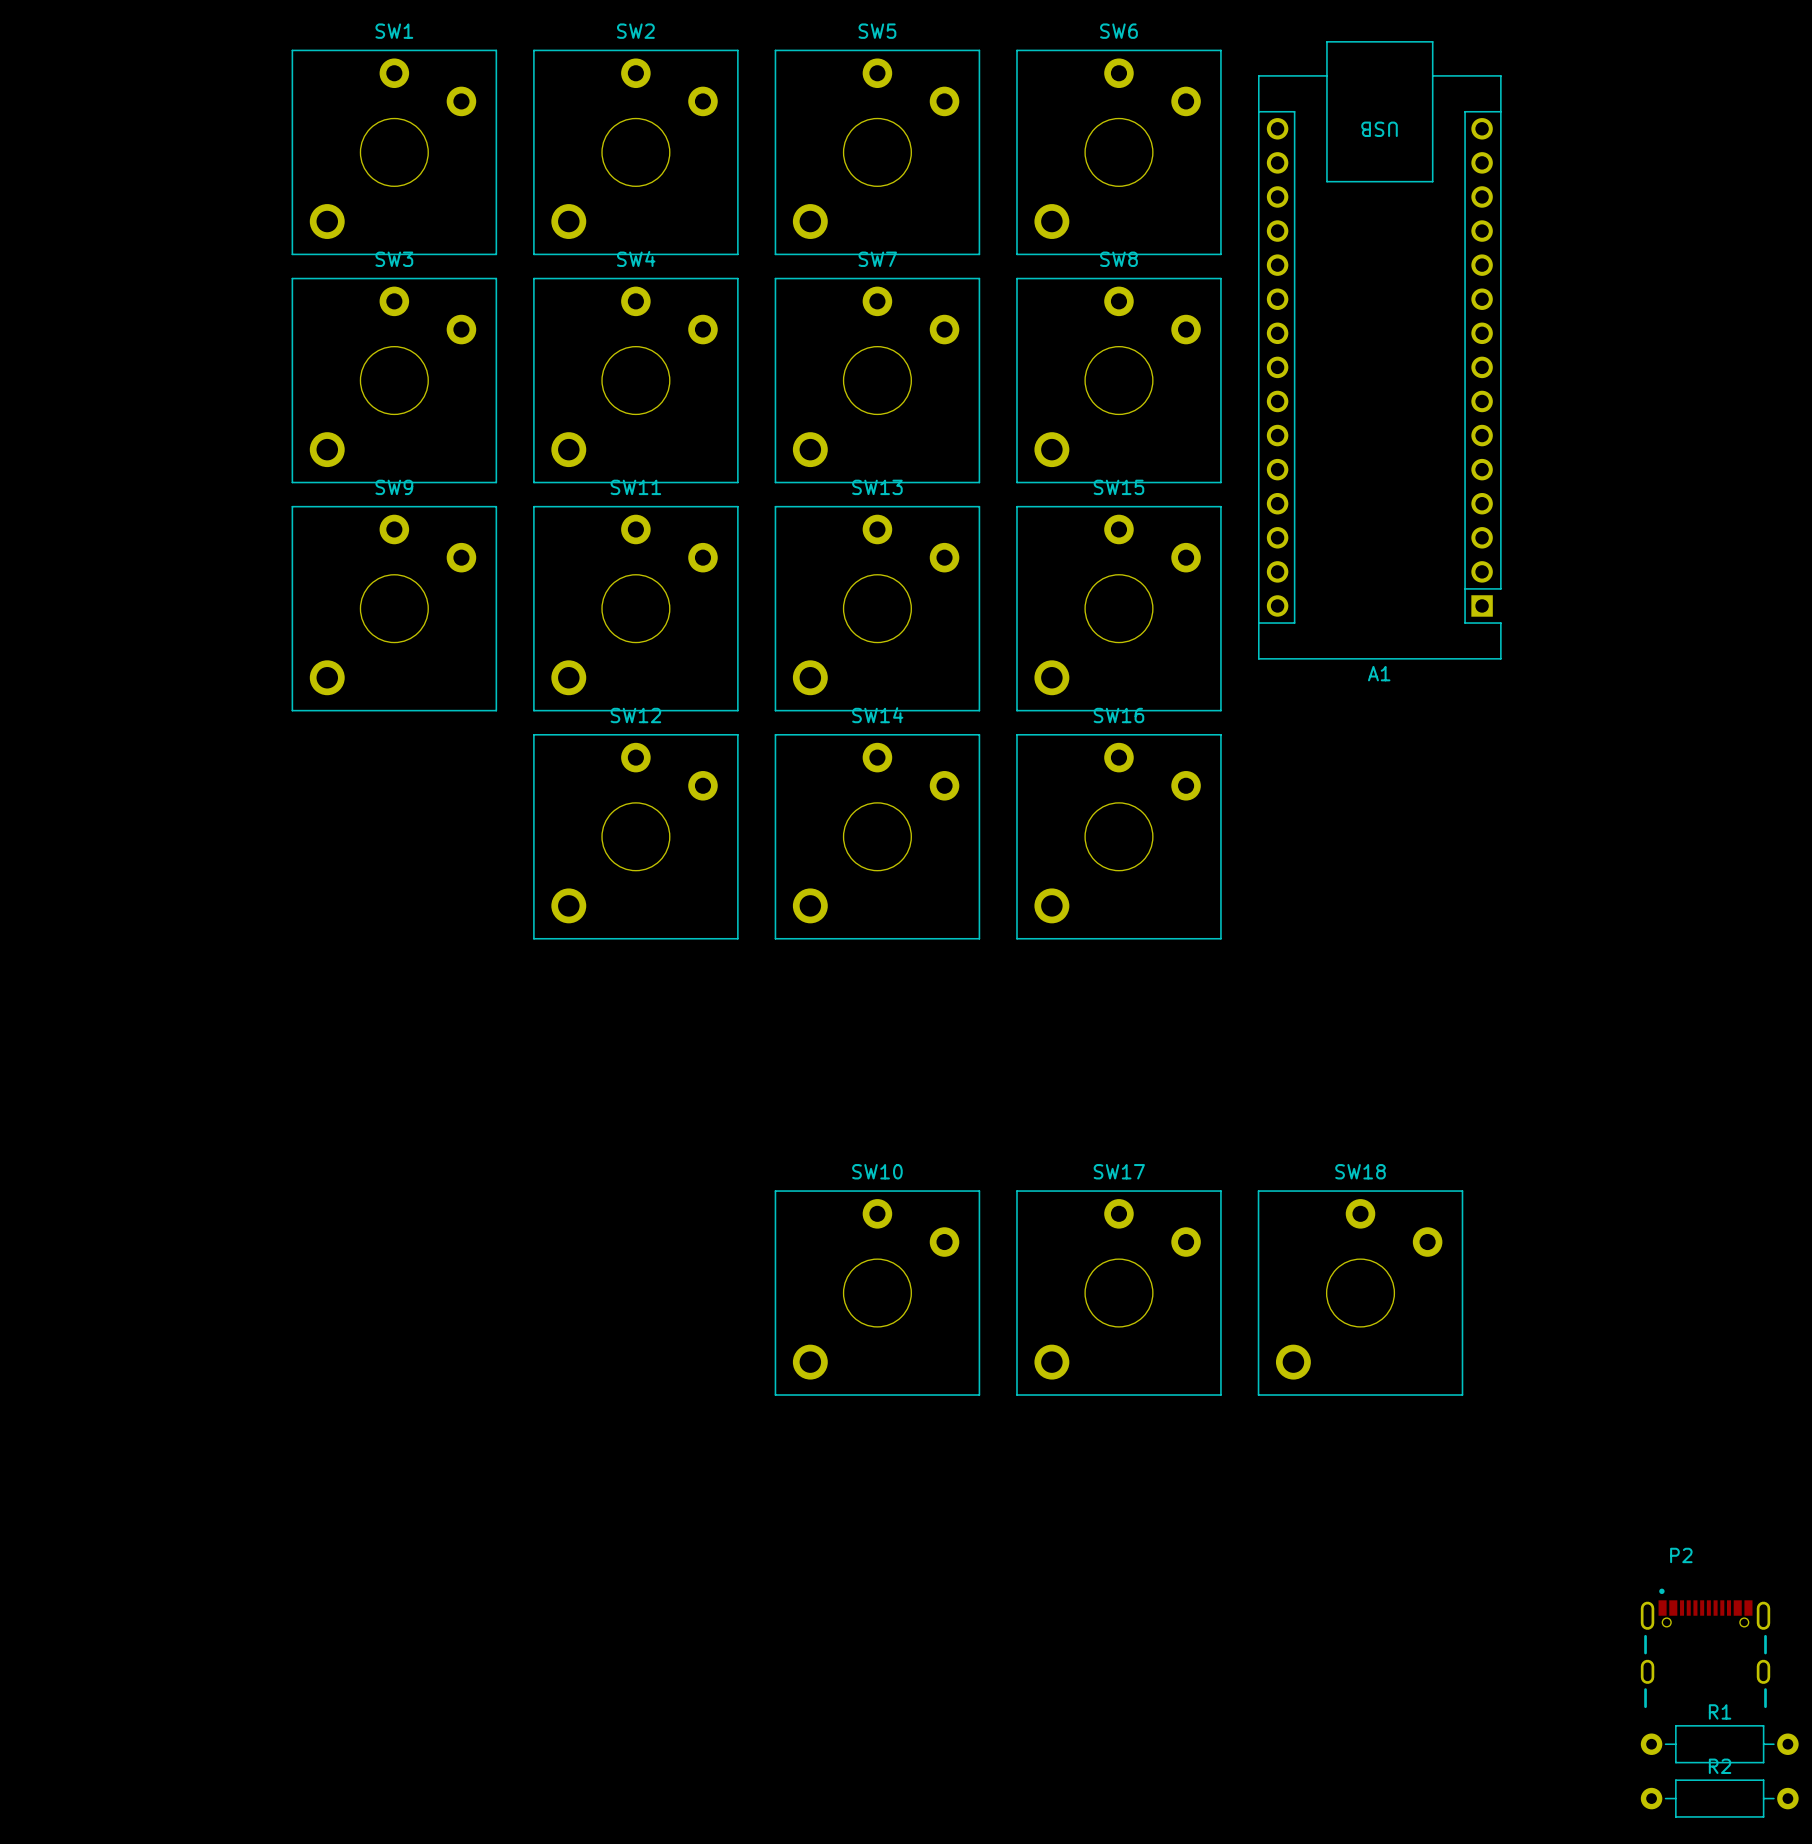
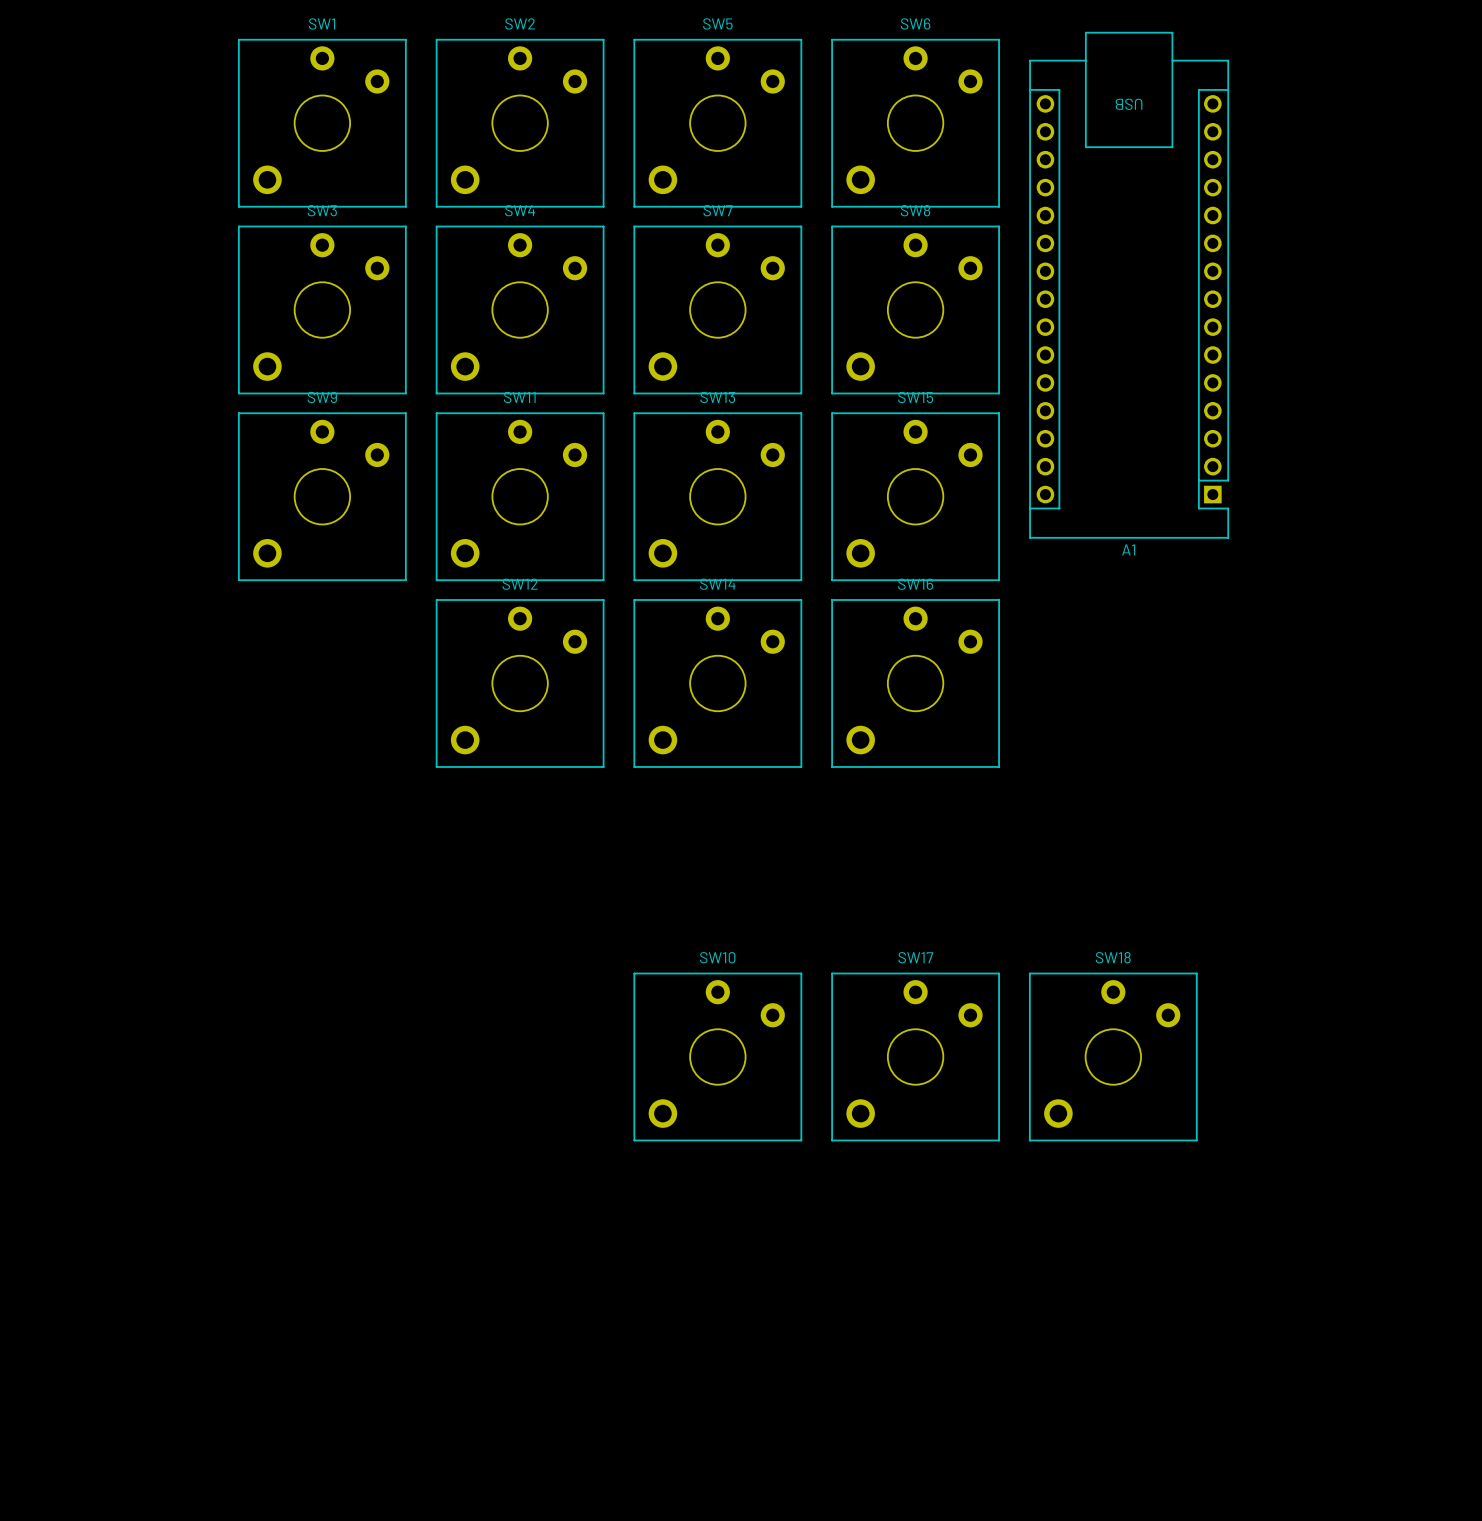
P2: (1705, 1648) -> none
R1: (1719, 1744) -> none
R2: (1719, 1798) -> none

